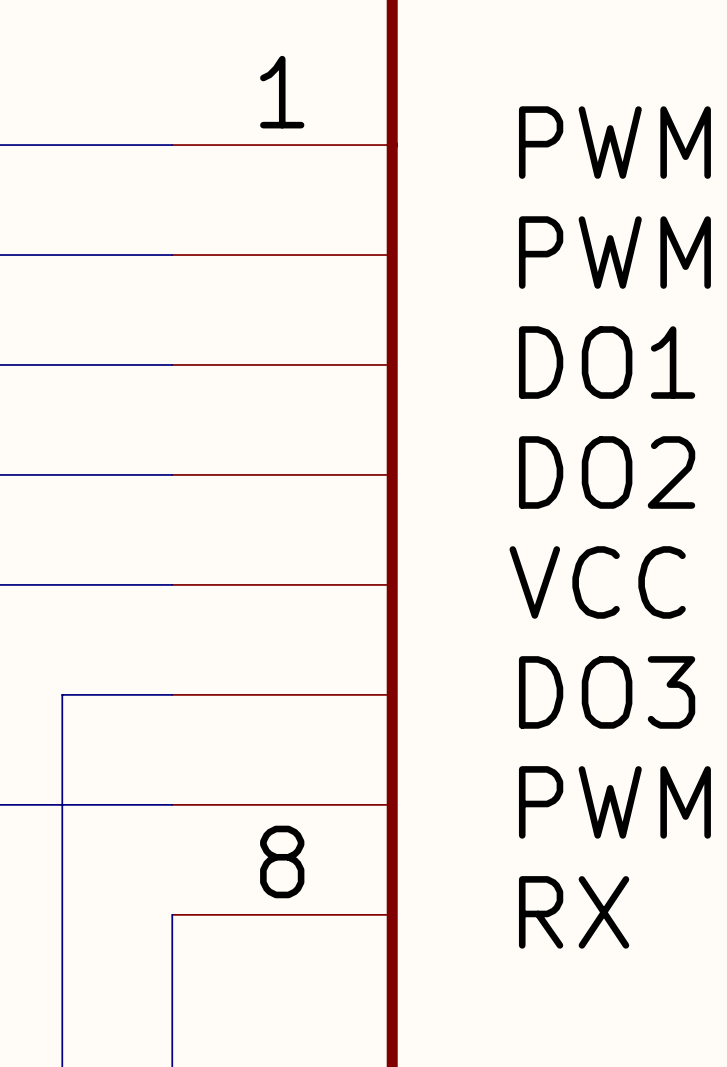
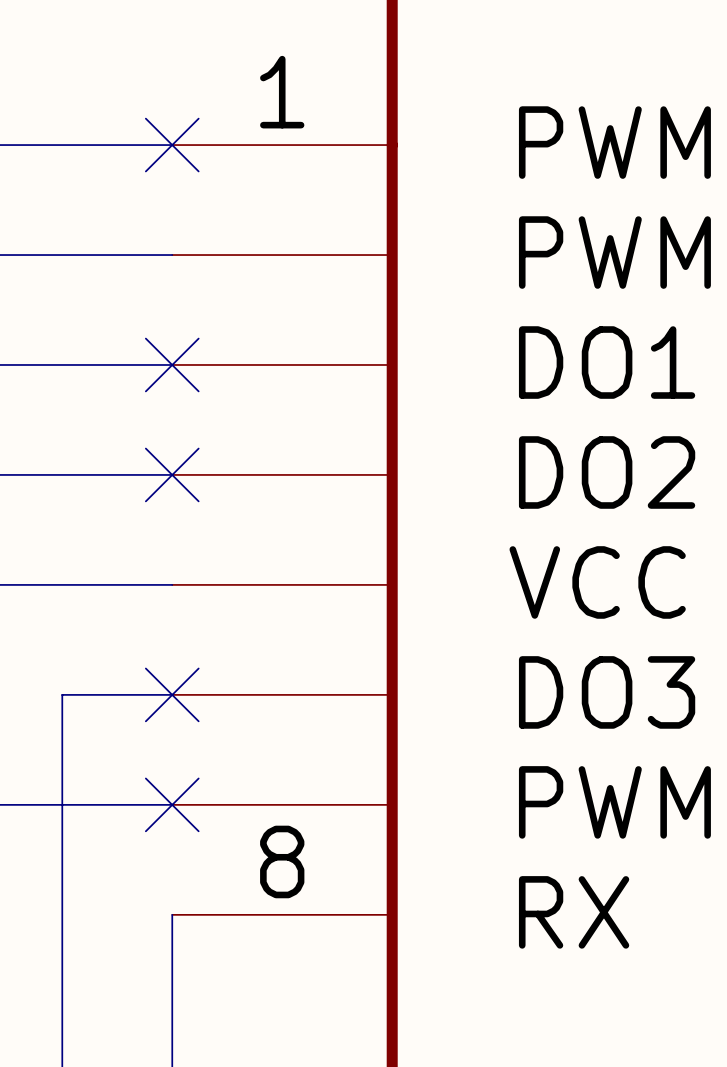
no-connect mark: none -> (172, 145)
no-connect mark: none -> (172, 364)
no-connect mark: none -> (172, 474)
no-connect mark: none -> (172, 694)
no-connect mark: none -> (172, 804)

